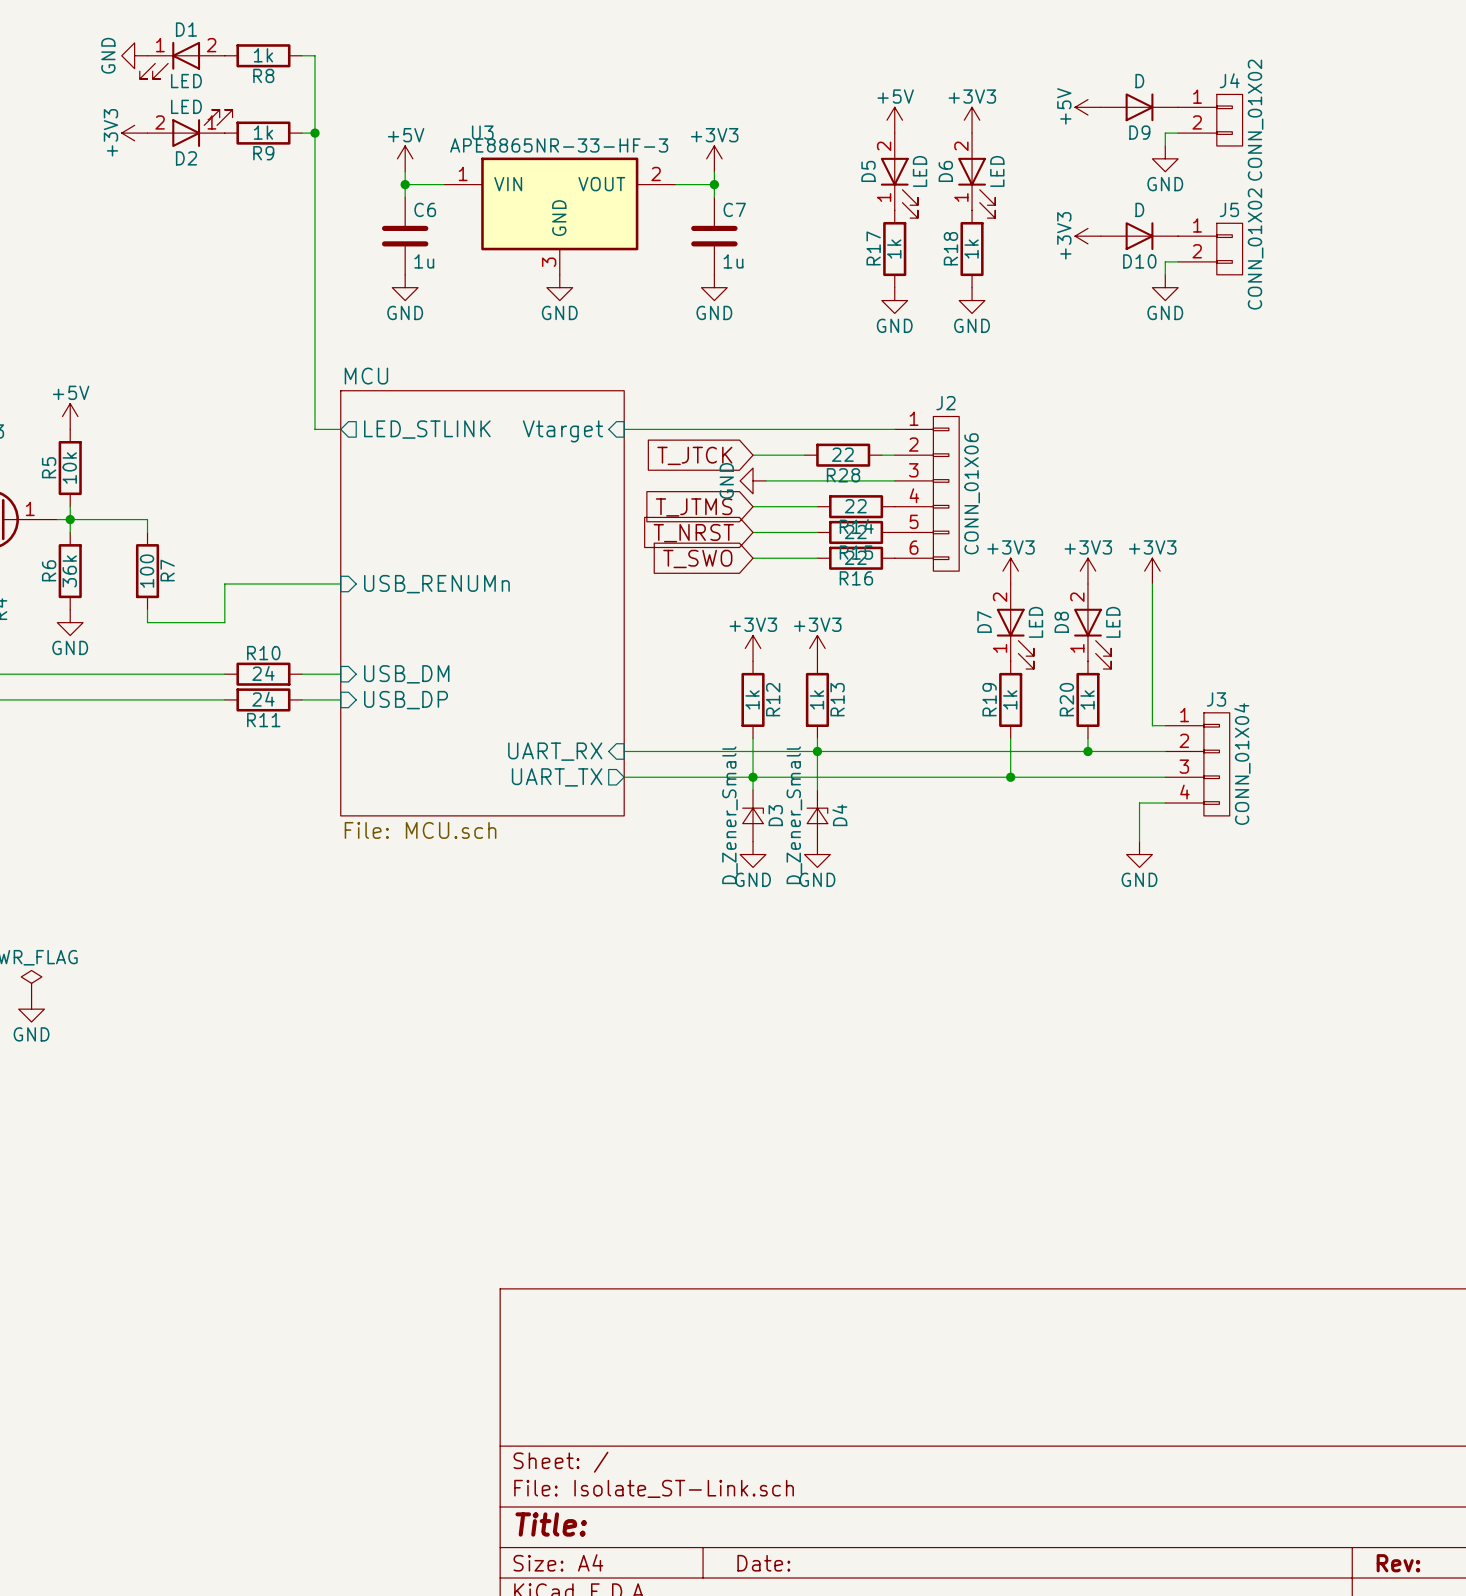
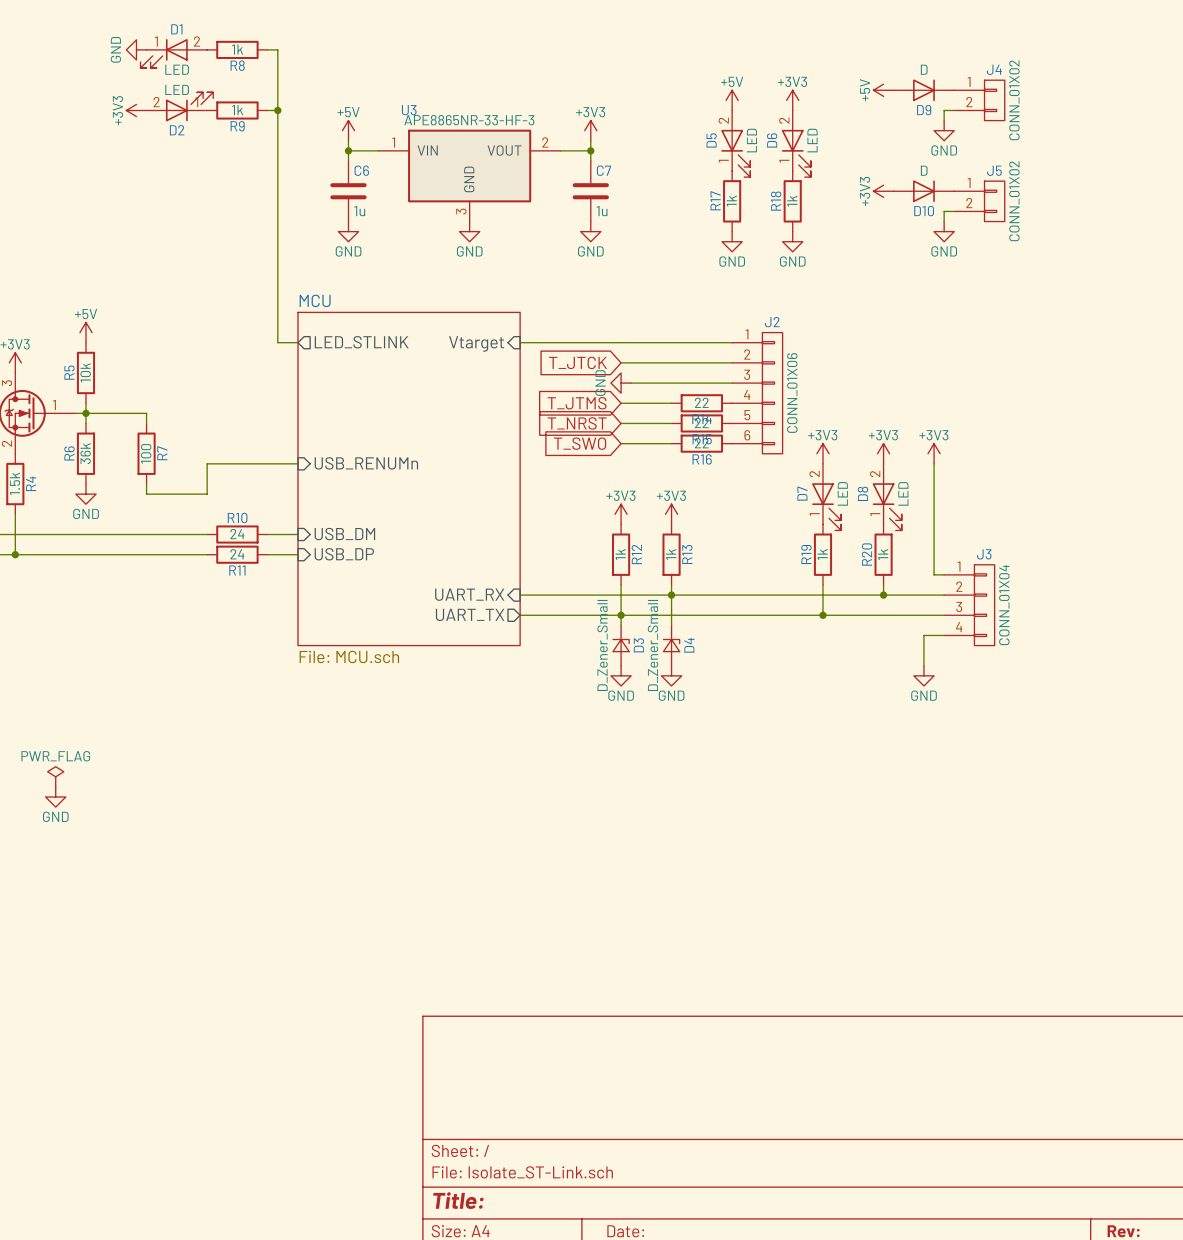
wire: none -> (661, 362) (722, 362)
R28: 22 (843, 455) -> none

